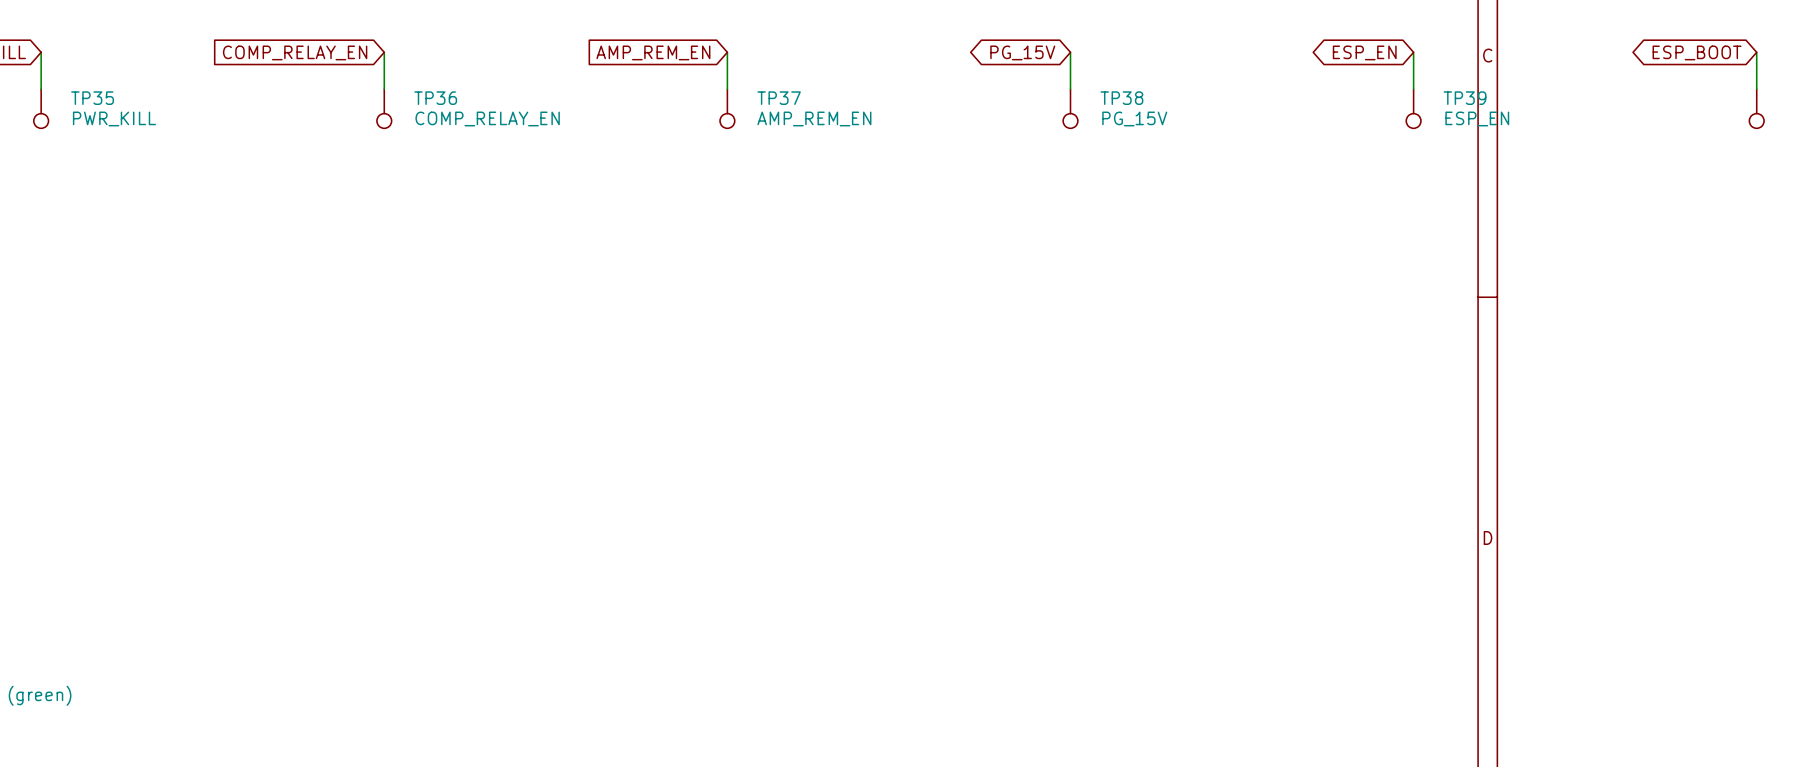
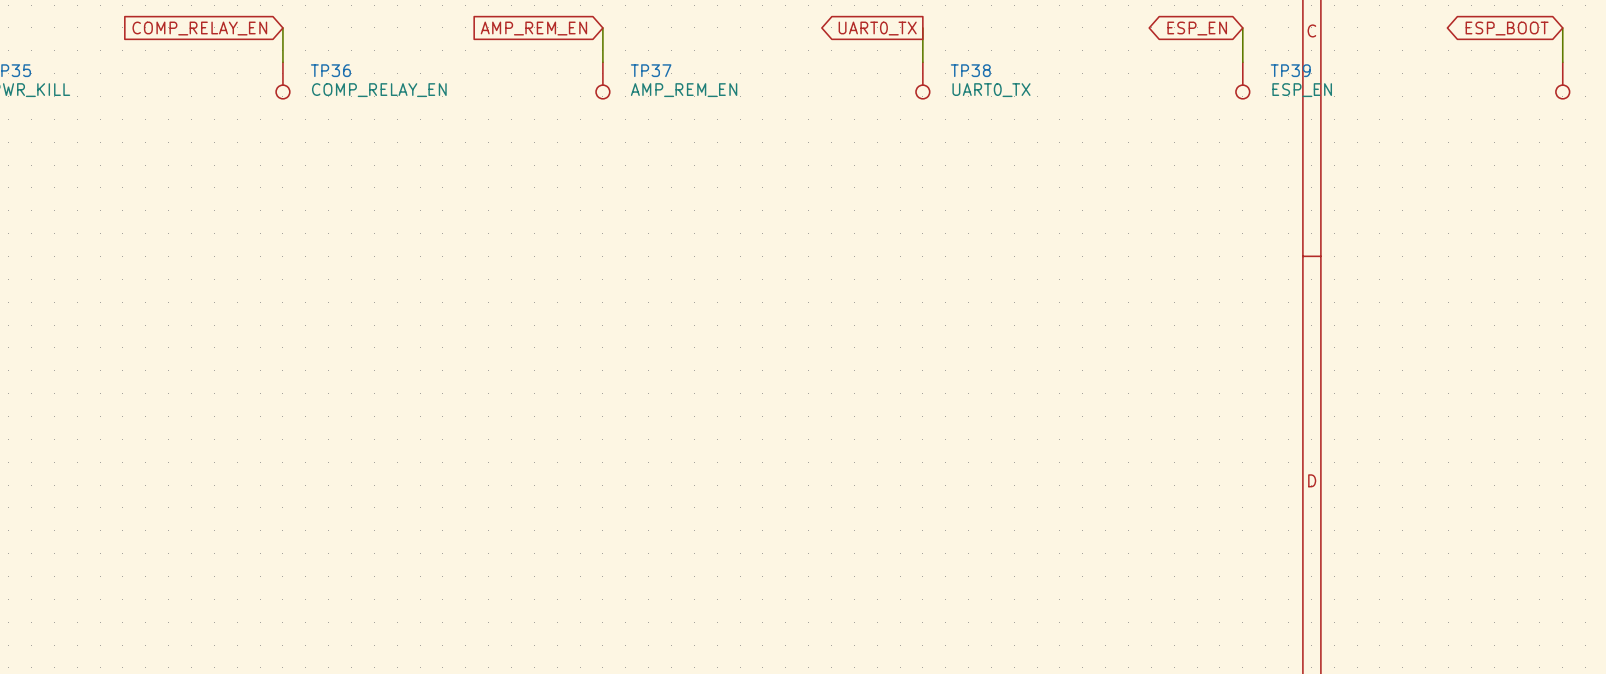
global label shape: bidirectional (1022, 52) -> output (877, 28)
global label: PG_15V (1022, 52) -> UART0_TX (877, 28)
TP38 value: PG_15V (1134, 118) -> UART0_TX (991, 90)

